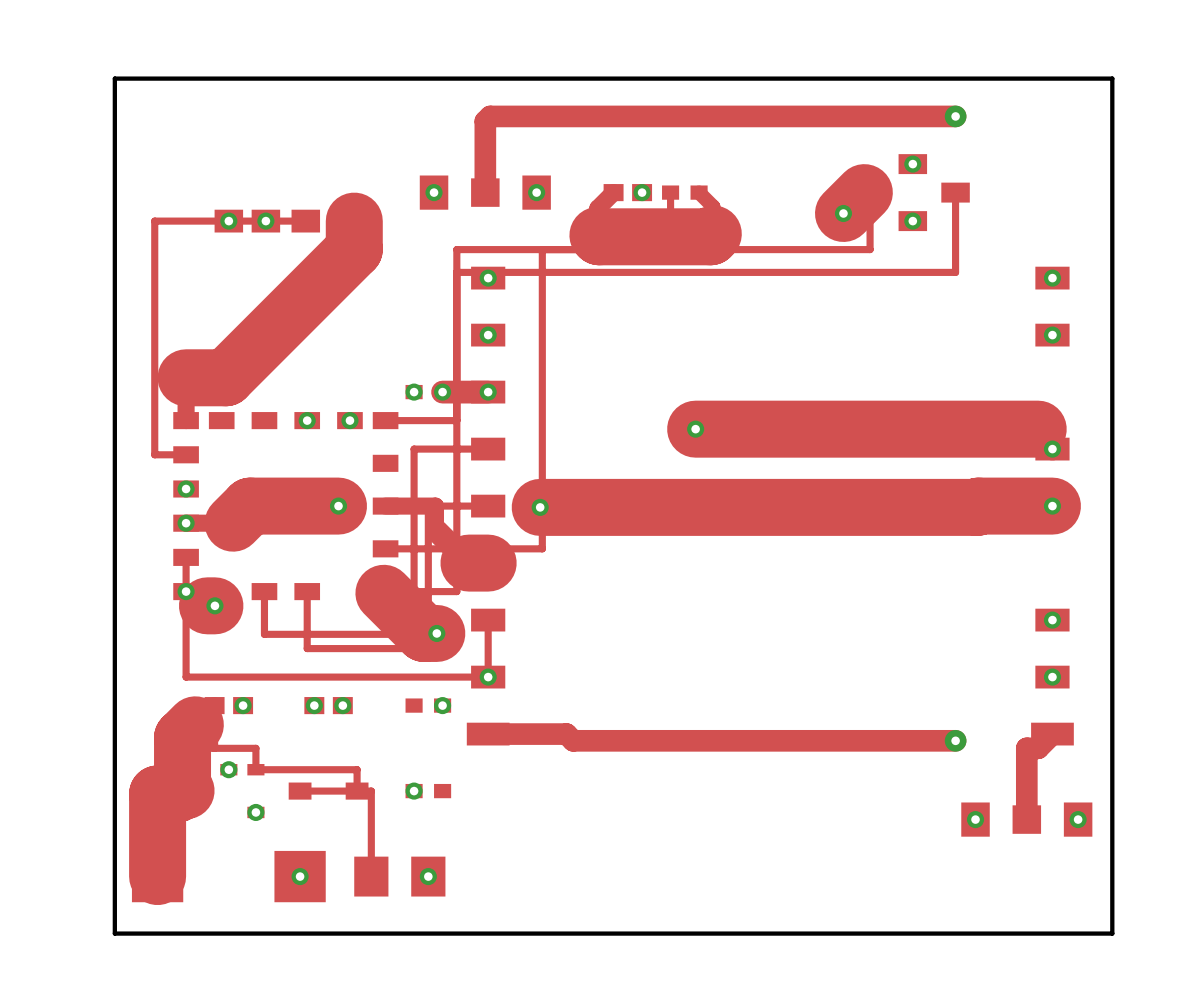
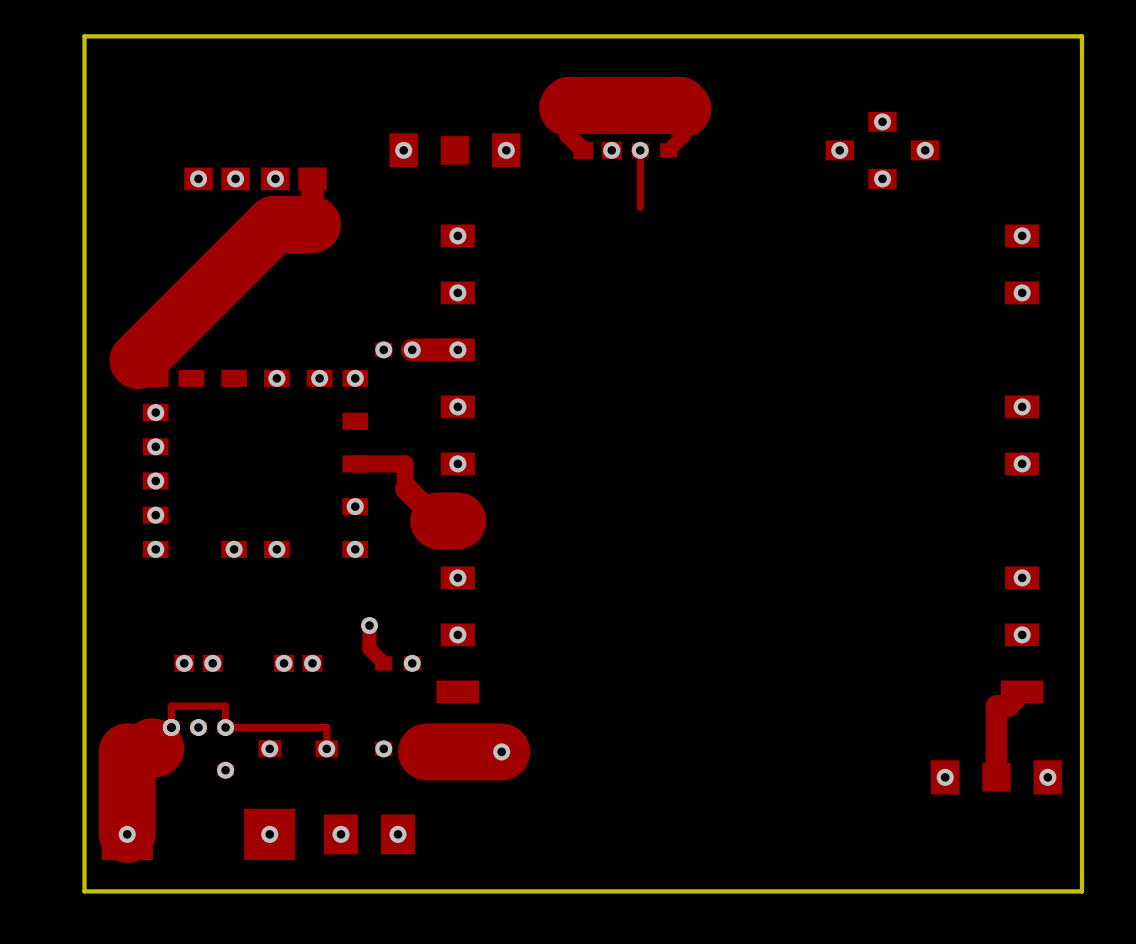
track: (955, 116) (490, 116) (485, 121) (485, 192) -> none
via: (955, 116) -> none
track: (613, 192) (597, 208) (599, 236) (710, 236) (713, 233) (713, 206) (699, 192) -> (583, 150) (567, 134) (567, 107) (569, 105) (679, 105) (683, 109) (683, 136) (668, 150)
via: none -> (640, 150)
track: (955, 192) (955, 272) (456, 272) -> none
via: none -> (925, 150)
track: (843, 213) (864, 192) (870, 192) (870, 249) (456, 249) (456, 591) (385, 591) (383, 593) (424, 633) (436, 633) -> none
via position: (843, 213) -> (839, 150)
track: (305, 221) (154, 221) (154, 454) (186, 454) -> none
via: none -> (275, 178)
track: (342, 221) (354, 221) (354, 249) (225, 377) (186, 377) (186, 420) -> (312, 178) (312, 224) (274, 224) (138, 360) (155, 378)
track: (542, 249) (542, 548) (385, 548) -> none
track: (385, 420) (456, 420) -> none
via: none -> (355, 378)
track: (695, 429) (1038, 429) (1052, 443) (1052, 449) -> none
via: (695, 429) -> none
track: (488, 449) (414, 449) (414, 648) (307, 648) (307, 591) -> none
via: none -> (457, 406)
via: none -> (155, 412)
track: (338, 506) (250, 506) (233, 523) (186, 523) -> none
via: (338, 506) -> none
track: (488, 506) (428, 506) (428, 634) (264, 634) (264, 591) -> none
via: none -> (457, 463)
track: (1052, 506) (540, 507) -> none
via: (540, 507) -> none
via: none -> (355, 506)
track: (186, 557) (186, 677) (488, 677) (488, 620) -> none
via: none -> (155, 515)
track: (186, 591) (193, 591) (207, 605) (214, 605) -> none
via: none -> (234, 549)
via: none -> (276, 549)
via: none -> (355, 549)
via: (214, 605) -> none
via: none -> (457, 577)
via: (436, 633) -> none
track: none -> (369, 625) (369, 649) (383, 663)
via: none -> (369, 625)
via: none -> (184, 663)
track: (488, 734) (566, 734) (573, 740) (955, 740) -> none
via: (955, 740) -> none
track: (214, 748) (214, 705) (182, 737) (182, 788) (177, 793) (157, 793) (157, 876) -> none
via: none -> (171, 727)
via: none -> (225, 727)
track: (300, 791) (371, 791) (371, 876) -> none
via: none -> (269, 748)
via: none -> (326, 748)
track: none -> (412, 748) (415, 751) (501, 751)
via: none -> (501, 751)
via: none -> (127, 834)
via: none -> (341, 834)

